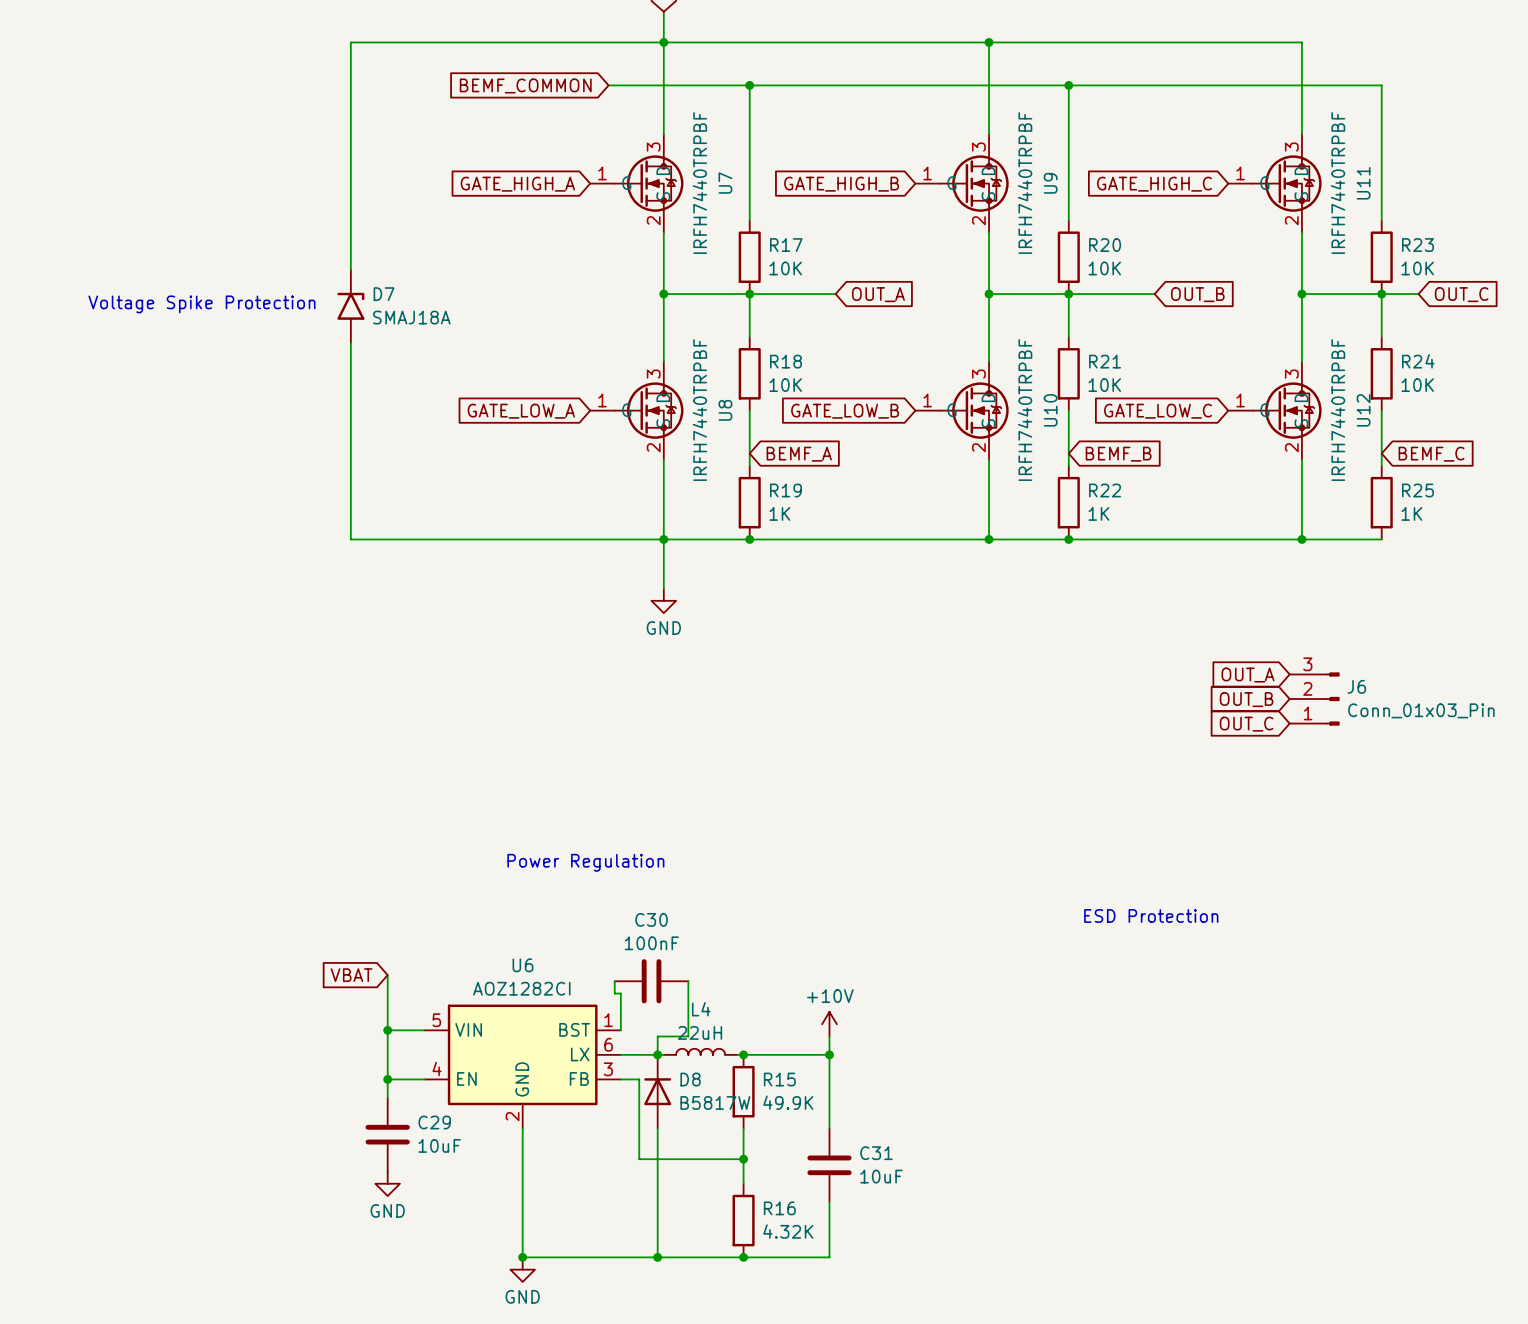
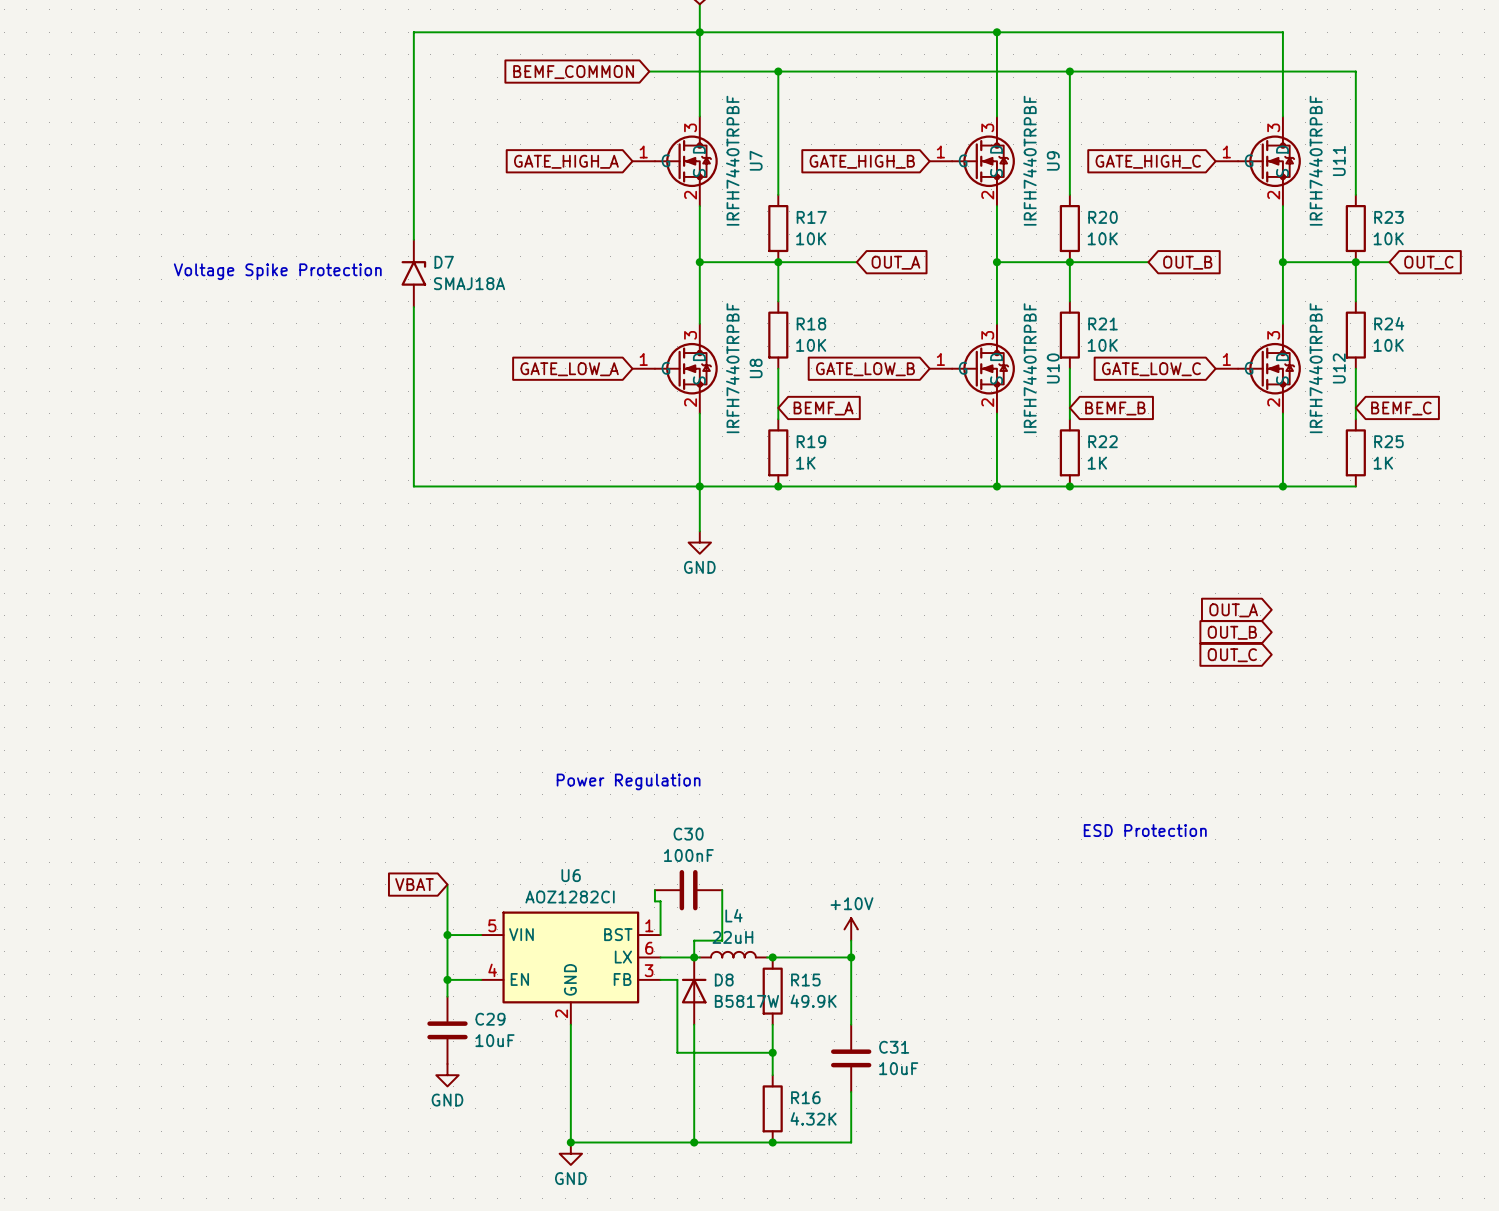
J6: Conn_01x03_Pin (1314, 699) -> none

